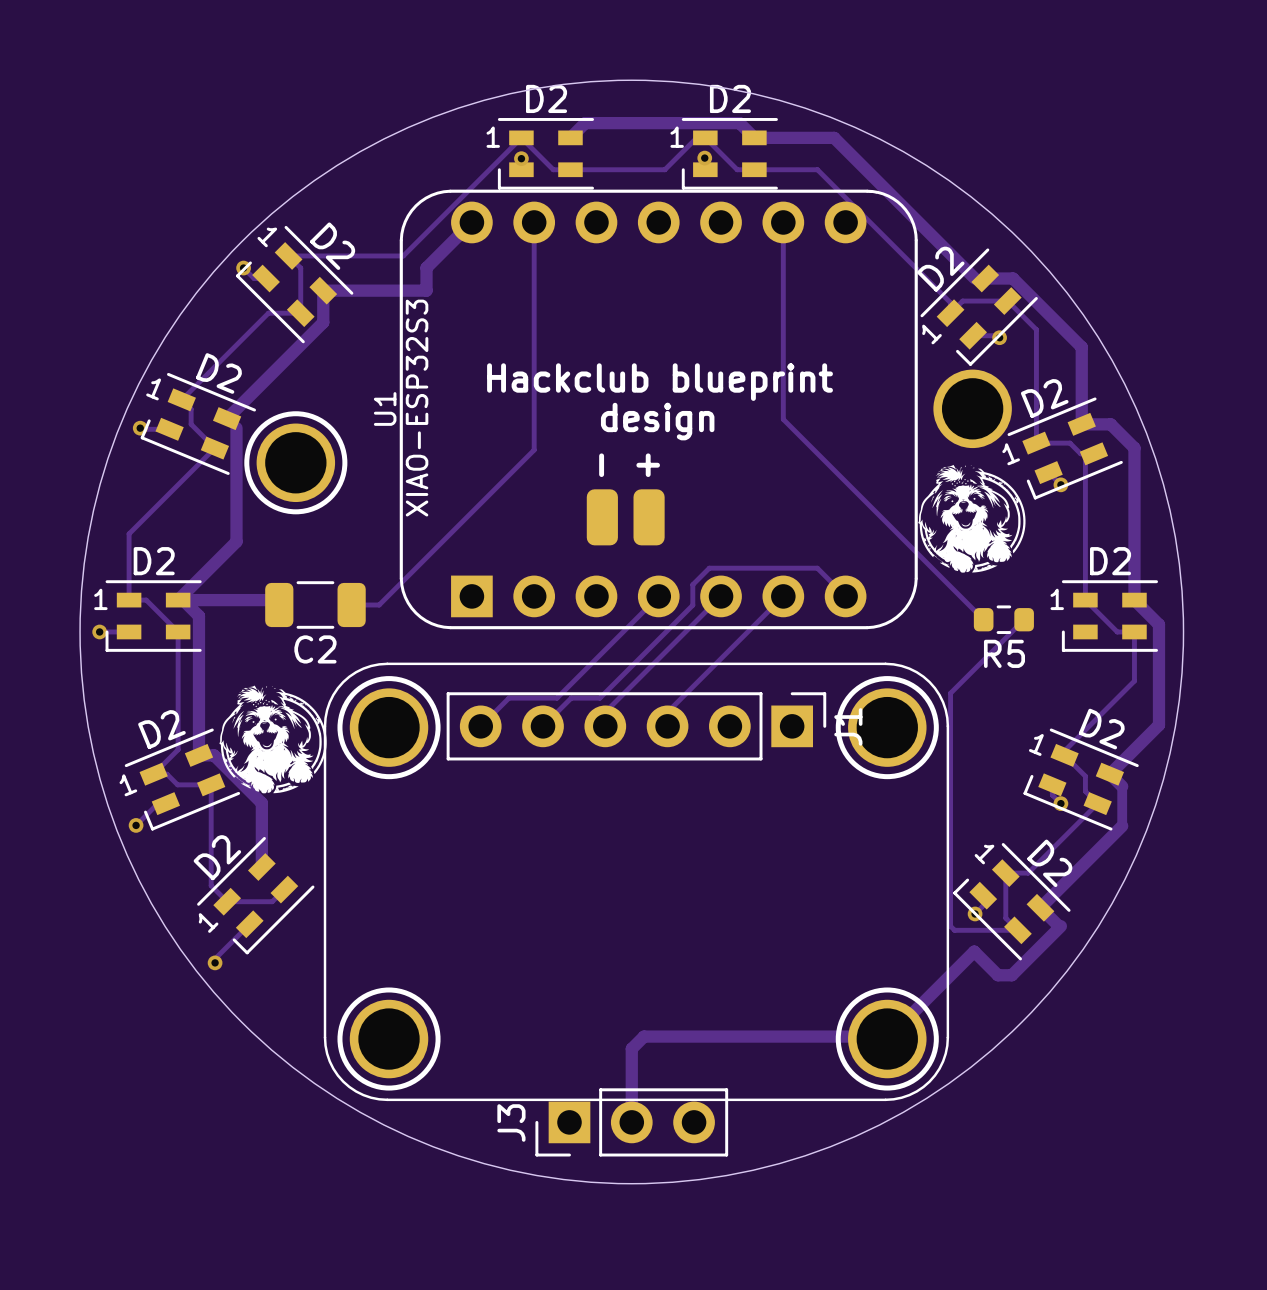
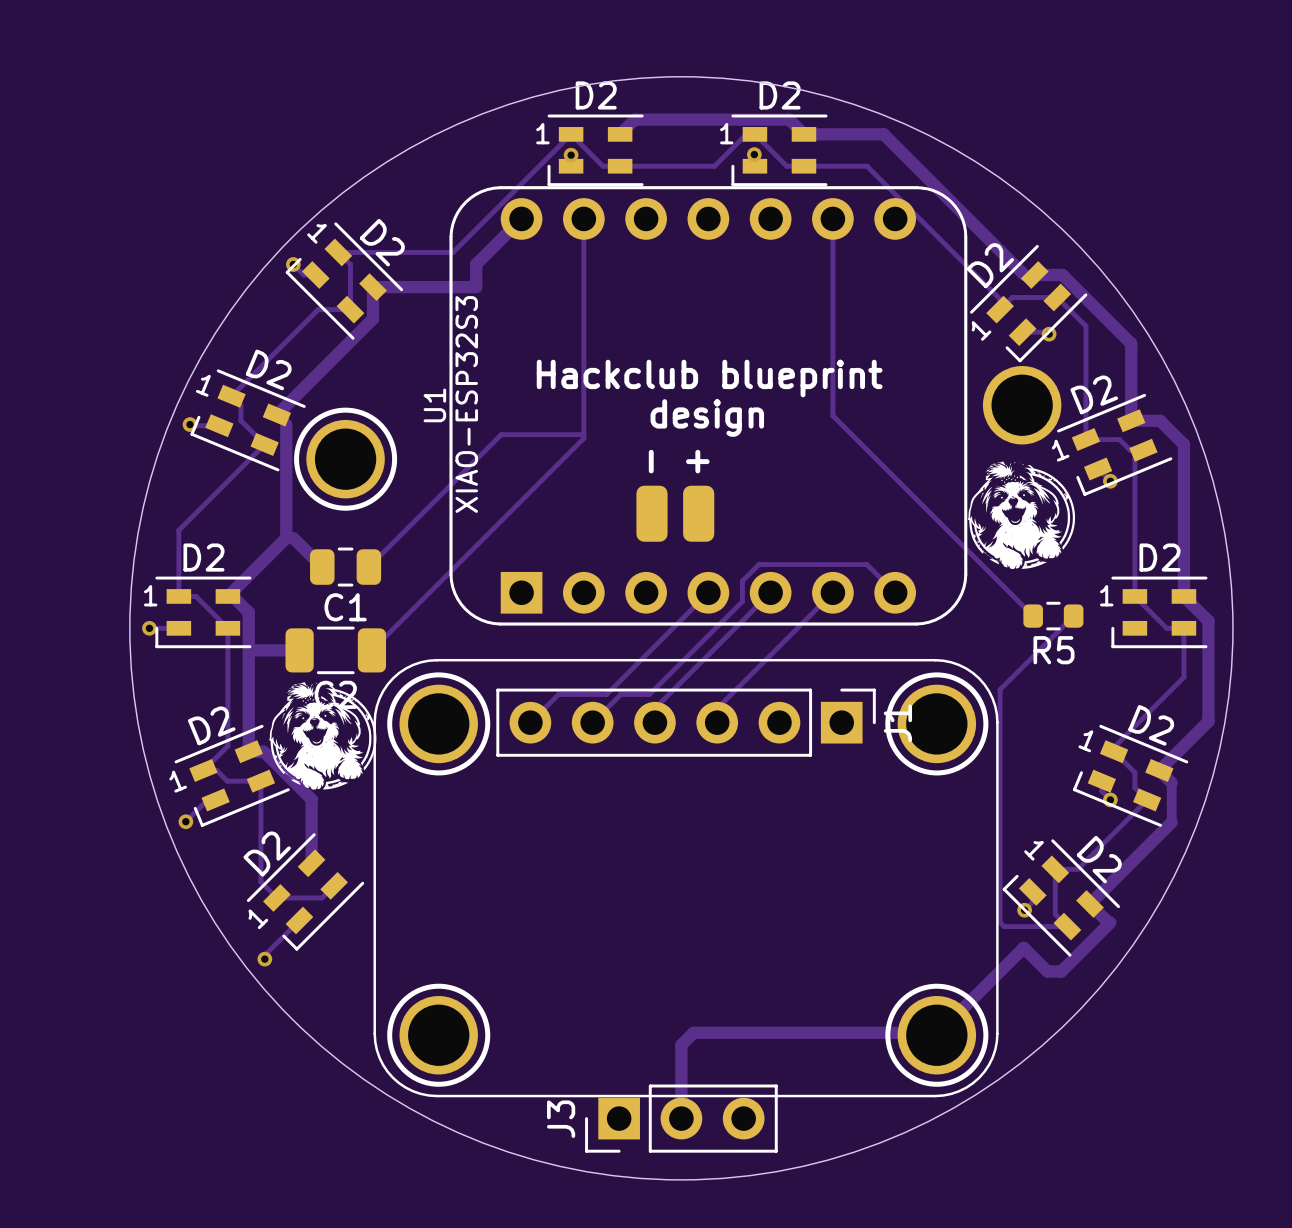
track: none -> (583, 434) (501, 434) (368, 567)
track: (534, 442) (534, 450) (379, 605) (351, 605) -> (583, 438) (371, 650)
track: none -> (286, 538) (293, 538) (322, 567)
C1: none -> (345, 567)
track: (178, 600) (272, 600) -> none
C2 position: (315, 605) -> (335, 650)
track: none -> (248, 645) (253, 650) (299, 650)

